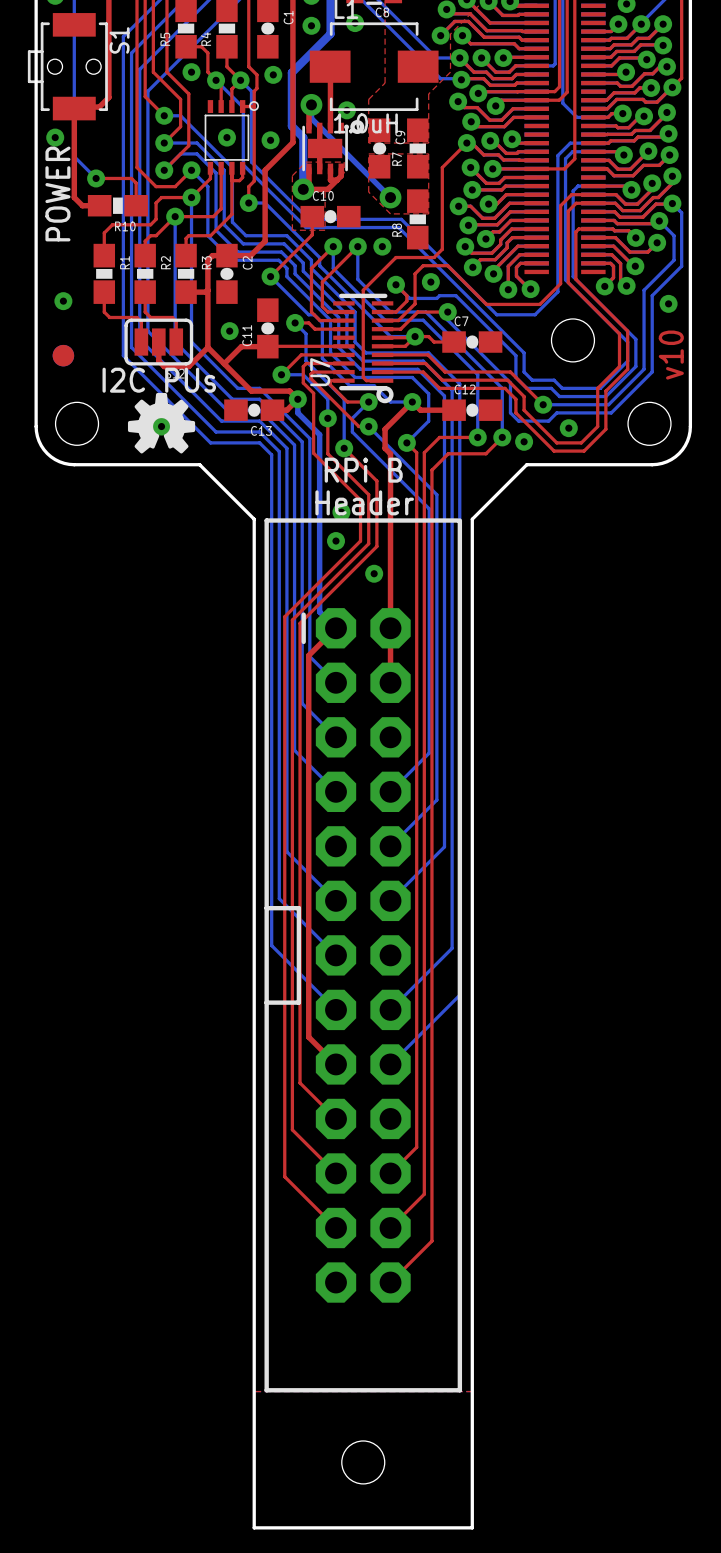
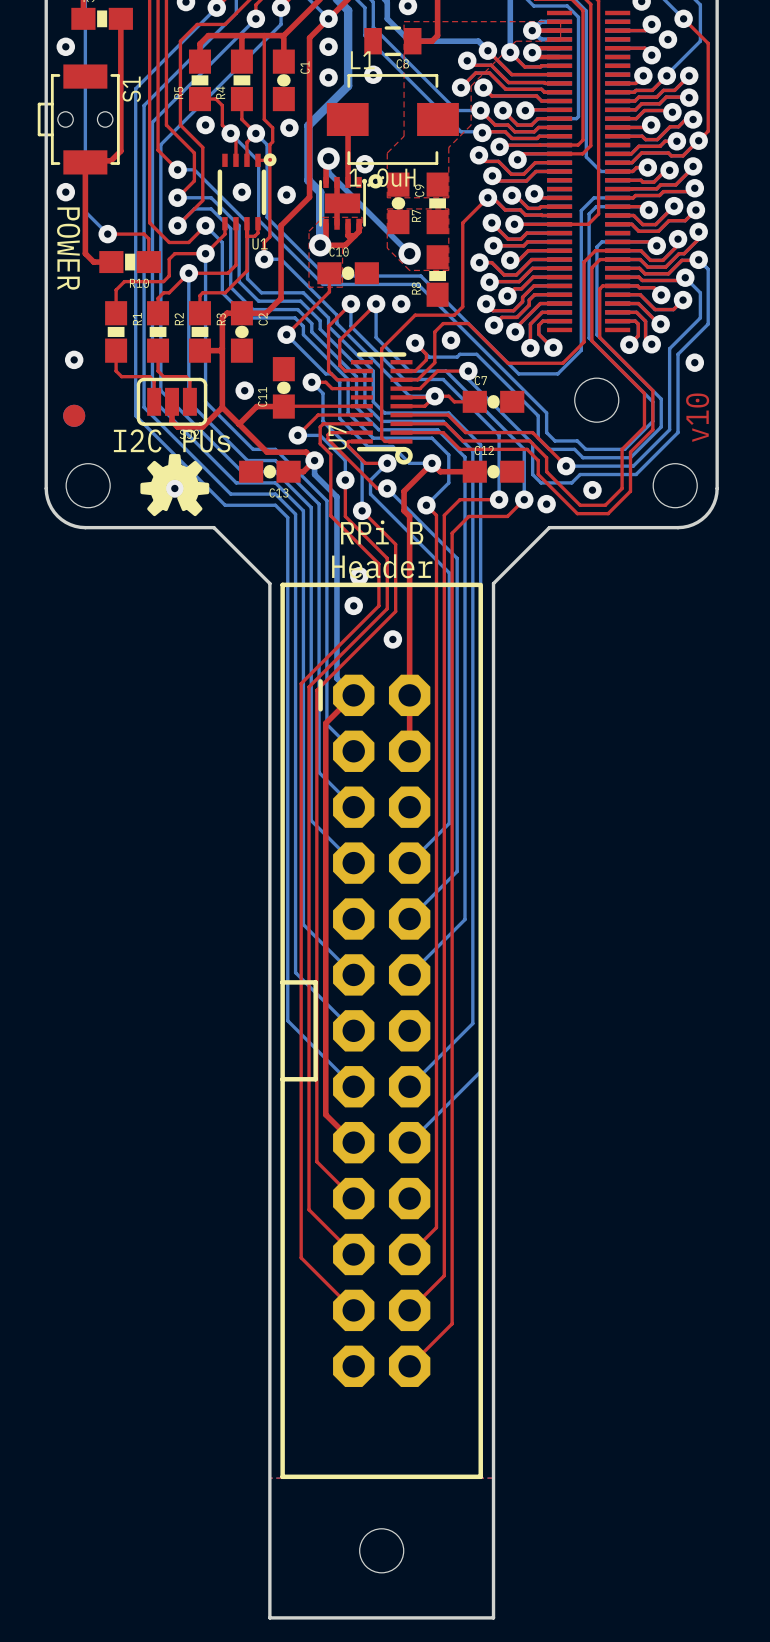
part: (231, 137) -> none
U1: none -> (247, 191)
text rotation: 0° (57, 194) -> 180° (68, 248)

